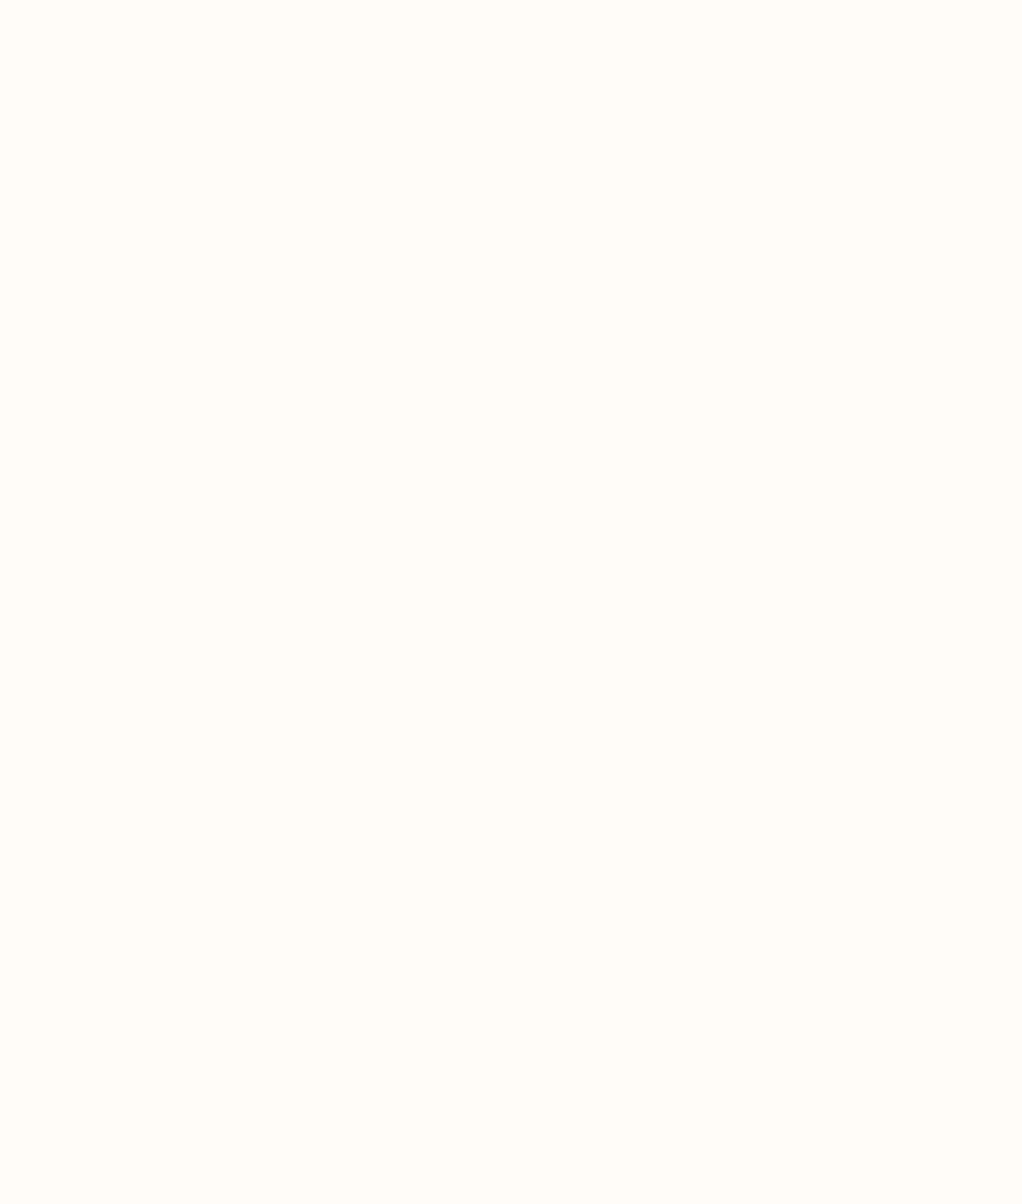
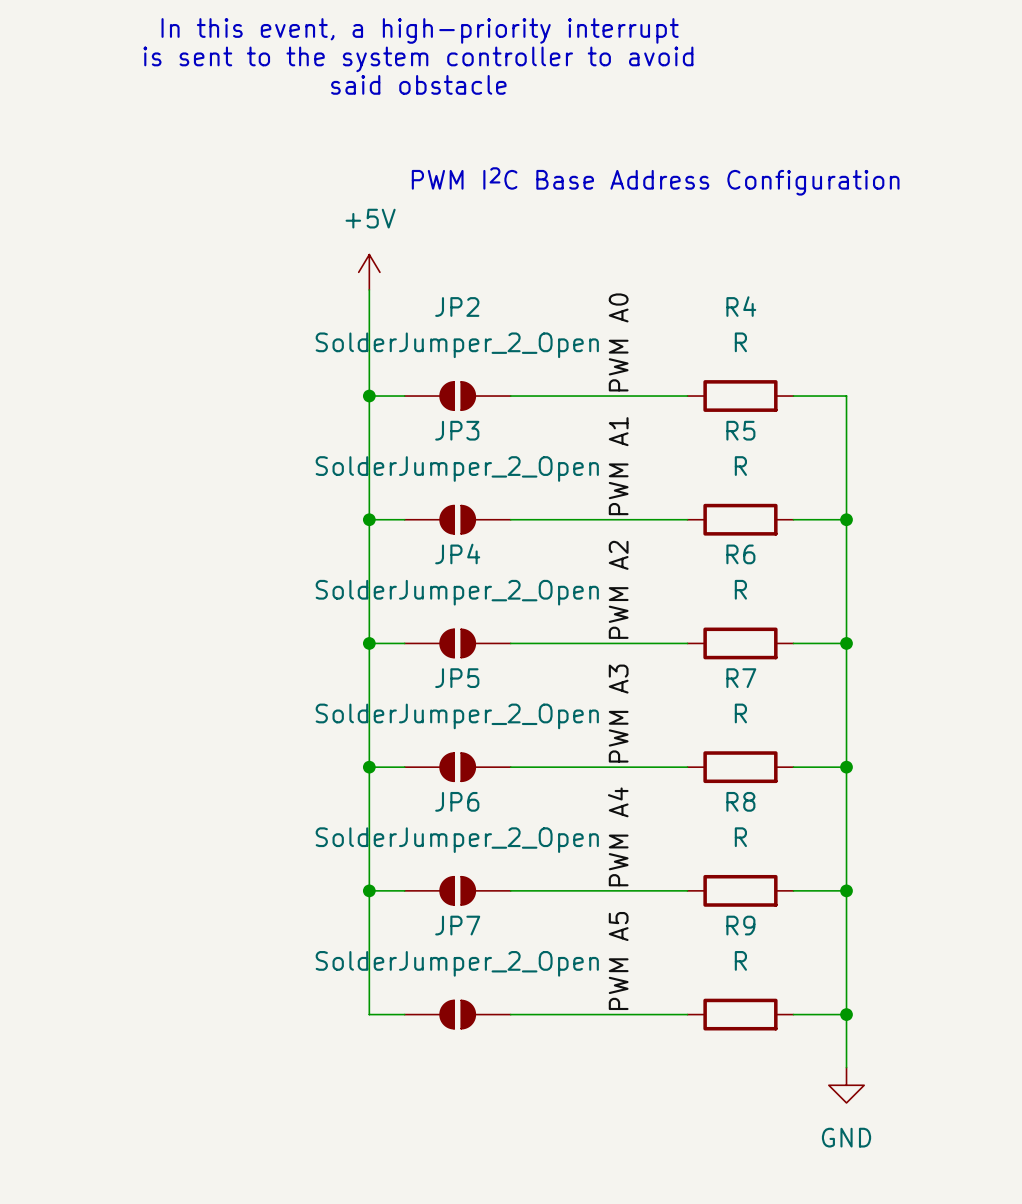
text: none -> In this event, a high-priority interrupt (420, 30)
text: none -> is sent to the system controller to avoid (418, 59)
text: none -> said obstacle (418, 84)
text: none -> PWM I2C Base Address Configuration (655, 181)
power symbol: none -> +5V (369, 272)
wire: none -> (369, 289) (369, 1014) (404, 1014)
label: none -> PWM A0 (618, 342)
wire: none -> (369, 396) (404, 396)
junction: none -> (369, 396)
JP2: none -> SolderJumper_2_Open (457, 396)
wire: none -> (510, 396) (687, 396)
R4: none -> R (740, 396)
wire: none -> (793, 396) (846, 396) (846, 1067)
label: none -> PWM A1 (618, 466)
wire: none -> (369, 519) (404, 519)
junction: none -> (369, 519)
JP3: none -> SolderJumper_2_Open (457, 519)
wire: none -> (510, 519) (687, 519)
R5: none -> R (740, 519)
wire: none -> (793, 519) (846, 519)
junction: none -> (846, 519)
label: none -> PWM A2 (618, 589)
wire: none -> (369, 643) (404, 643)
junction: none -> (369, 643)
JP4: none -> SolderJumper_2_Open (457, 643)
wire: none -> (510, 643) (687, 643)
R6: none -> R (740, 643)
wire: none -> (793, 643) (846, 643)
junction: none -> (846, 643)
label: none -> PWM A3 (618, 713)
wire: none -> (369, 767) (404, 767)
junction: none -> (369, 767)
JP5: none -> SolderJumper_2_Open (457, 767)
wire: none -> (510, 767) (687, 767)
R7: none -> R (740, 767)
wire: none -> (793, 767) (846, 767)
junction: none -> (846, 767)
label: none -> PWM A4 (618, 836)
wire: none -> (369, 890) (404, 890)
junction: none -> (369, 890)
JP6: none -> SolderJumper_2_Open (457, 890)
wire: none -> (510, 890) (687, 890)
R8: none -> R (740, 890)
wire: none -> (793, 890) (846, 890)
junction: none -> (846, 890)
label: none -> PWM A5 (618, 961)
JP7: none -> SolderJumper_2_Open (457, 1014)
wire: none -> (510, 1014) (687, 1014)
R9: none -> R (740, 1014)
wire: none -> (793, 1014) (846, 1014)
junction: none -> (846, 1014)
power symbol: none -> GND (846, 1085)

